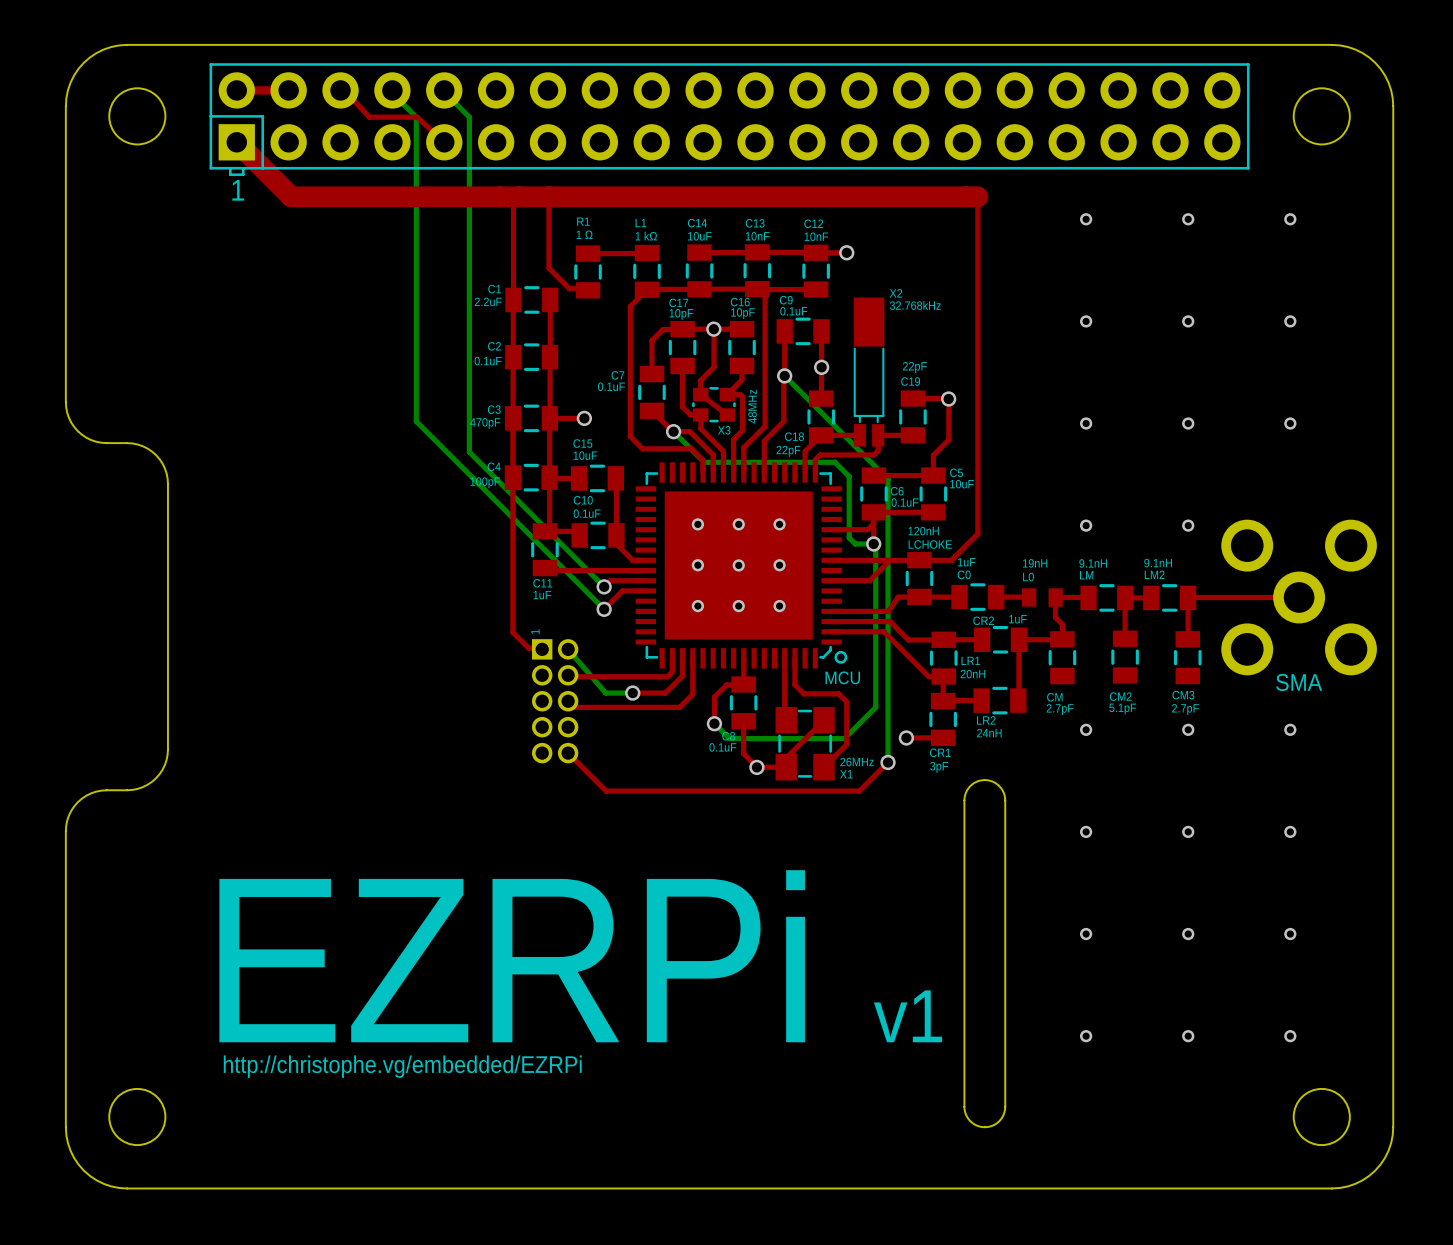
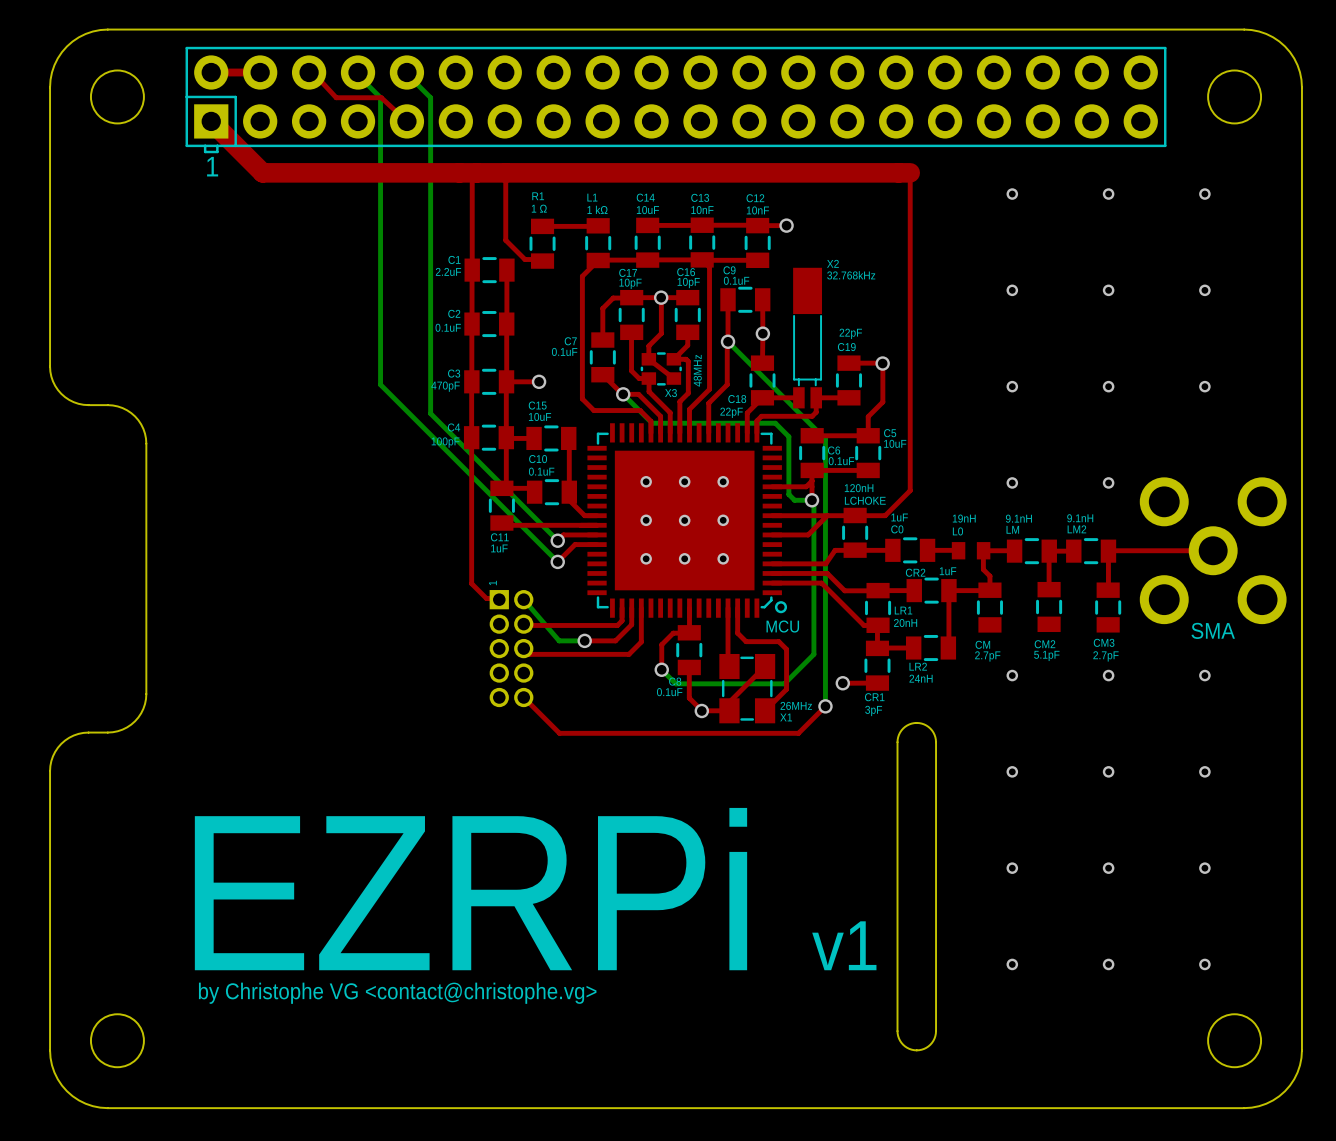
text: http://christophe.vg/embedded/EZRPi (402, 1066) -> by Christophe VG <contact@christophe.vg> (397, 993)

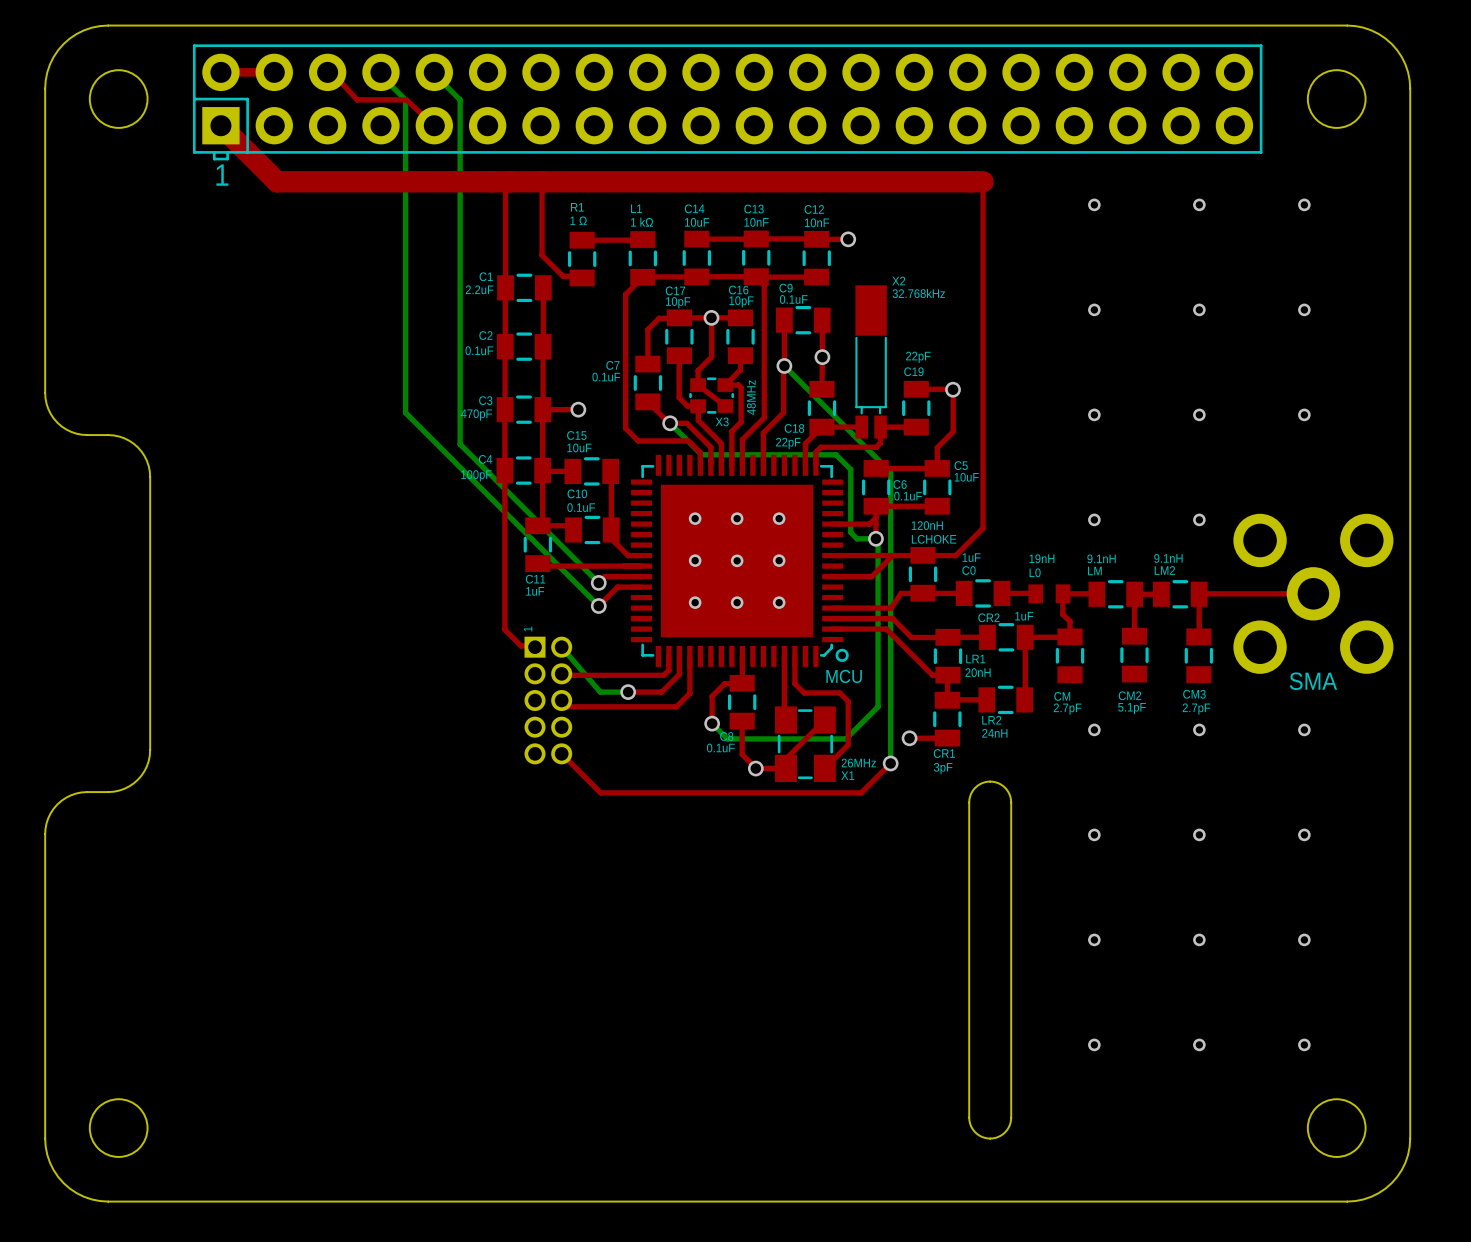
text: EZRPi (470, 889) -> none
text: v1 (844, 945) -> none
text: by Christophe VG <contact@christophe.vg> (397, 993) -> none

